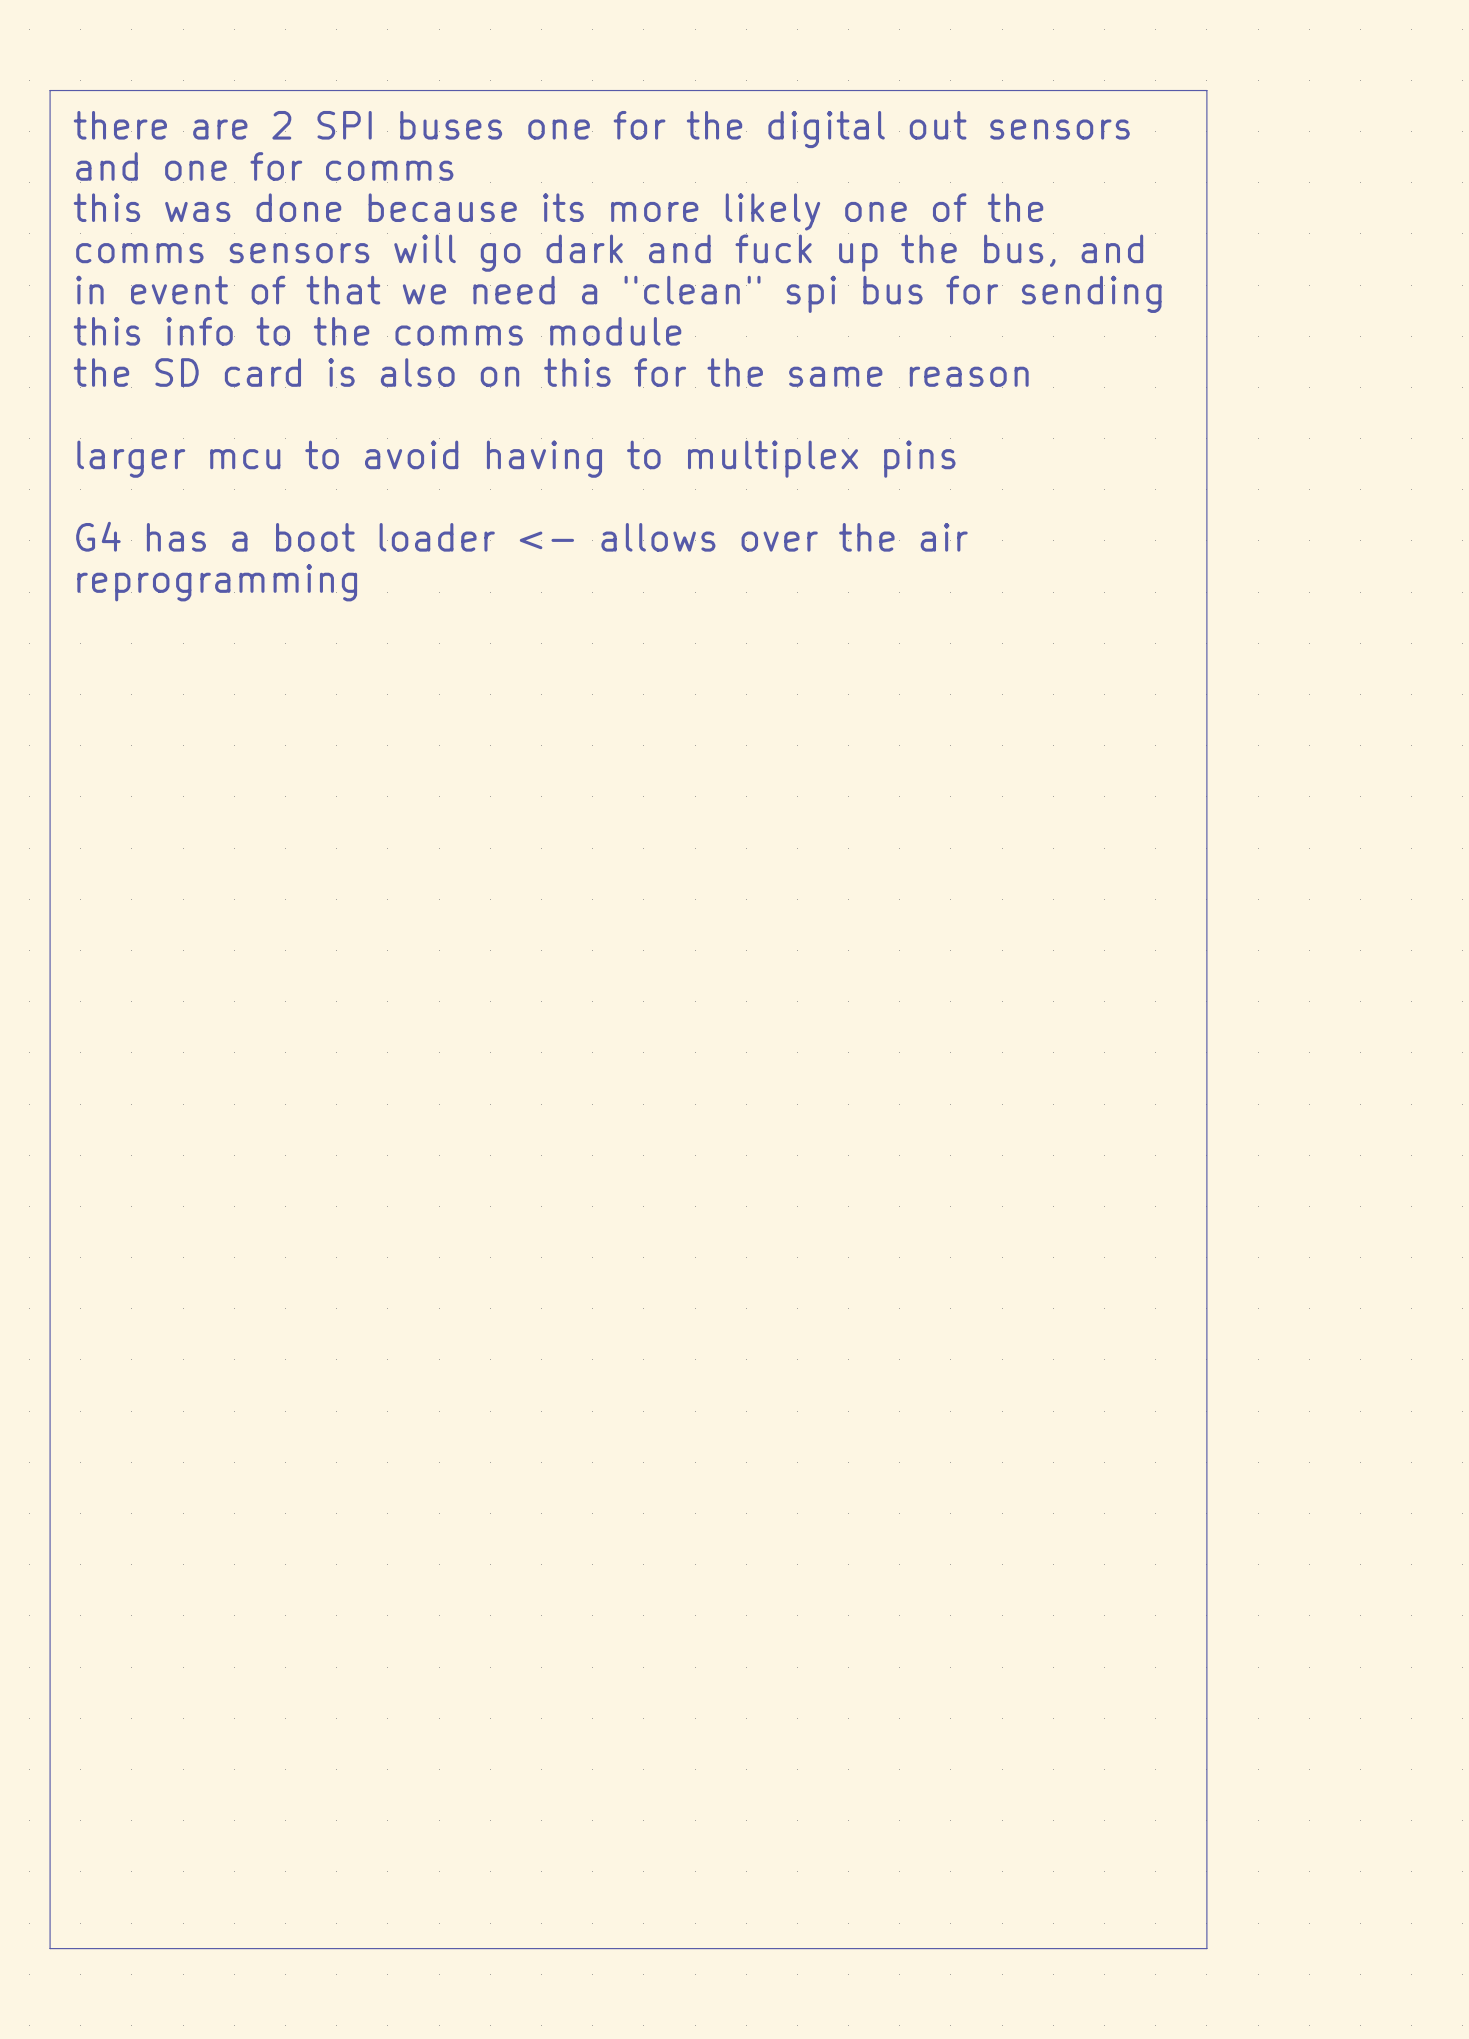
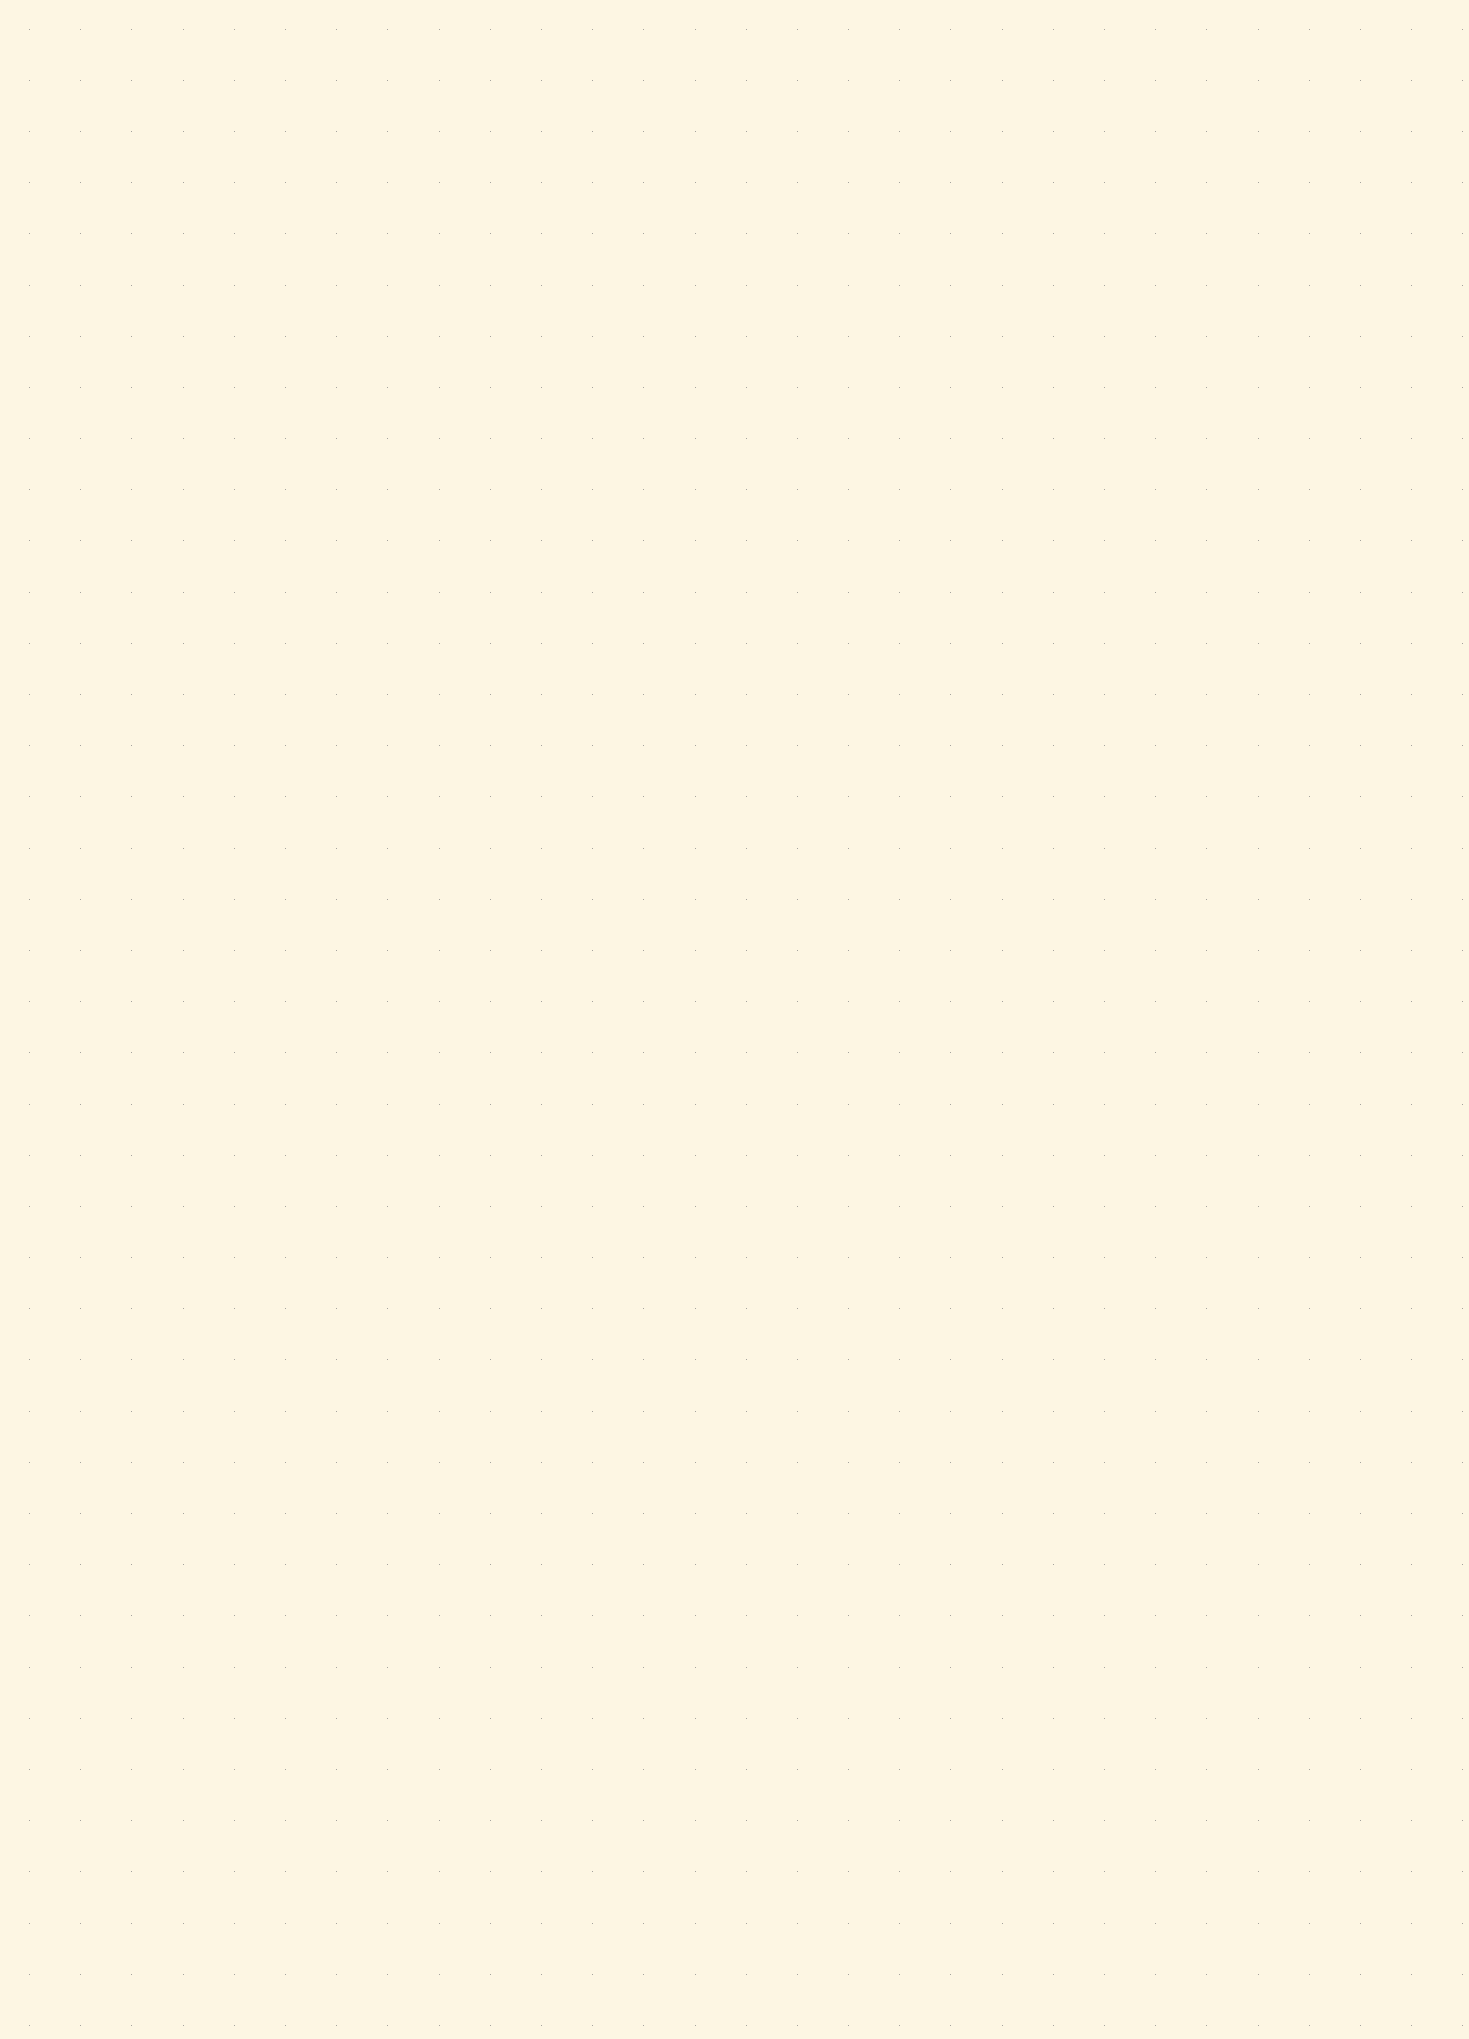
line: (50, 90) (1206, 90) (1206, 1948) (50, 1948) (50, 90) -> none
text: there are 2 SPI buses one for the digital out sensors (601, 129) -> none
text: and one for comms (264, 166) -> none
text: this was done because its more likely one of the (558, 211) -> none
text: comms sensors will go dark and fuck up the bus, and (609, 253) -> none
text: in event of that we need a "clean" spi bus for sending (618, 294) -> none
text: this info to the comms module (377, 331) -> none
text: the SD card is also on this for the same reason (551, 372) -> none
text: larger mcu to avoid having to multiplex pins (516, 459) -> none
text: G4 has a boot loader <- allows over the air (521, 536) -> none
text: reprogramming (217, 582) -> none

